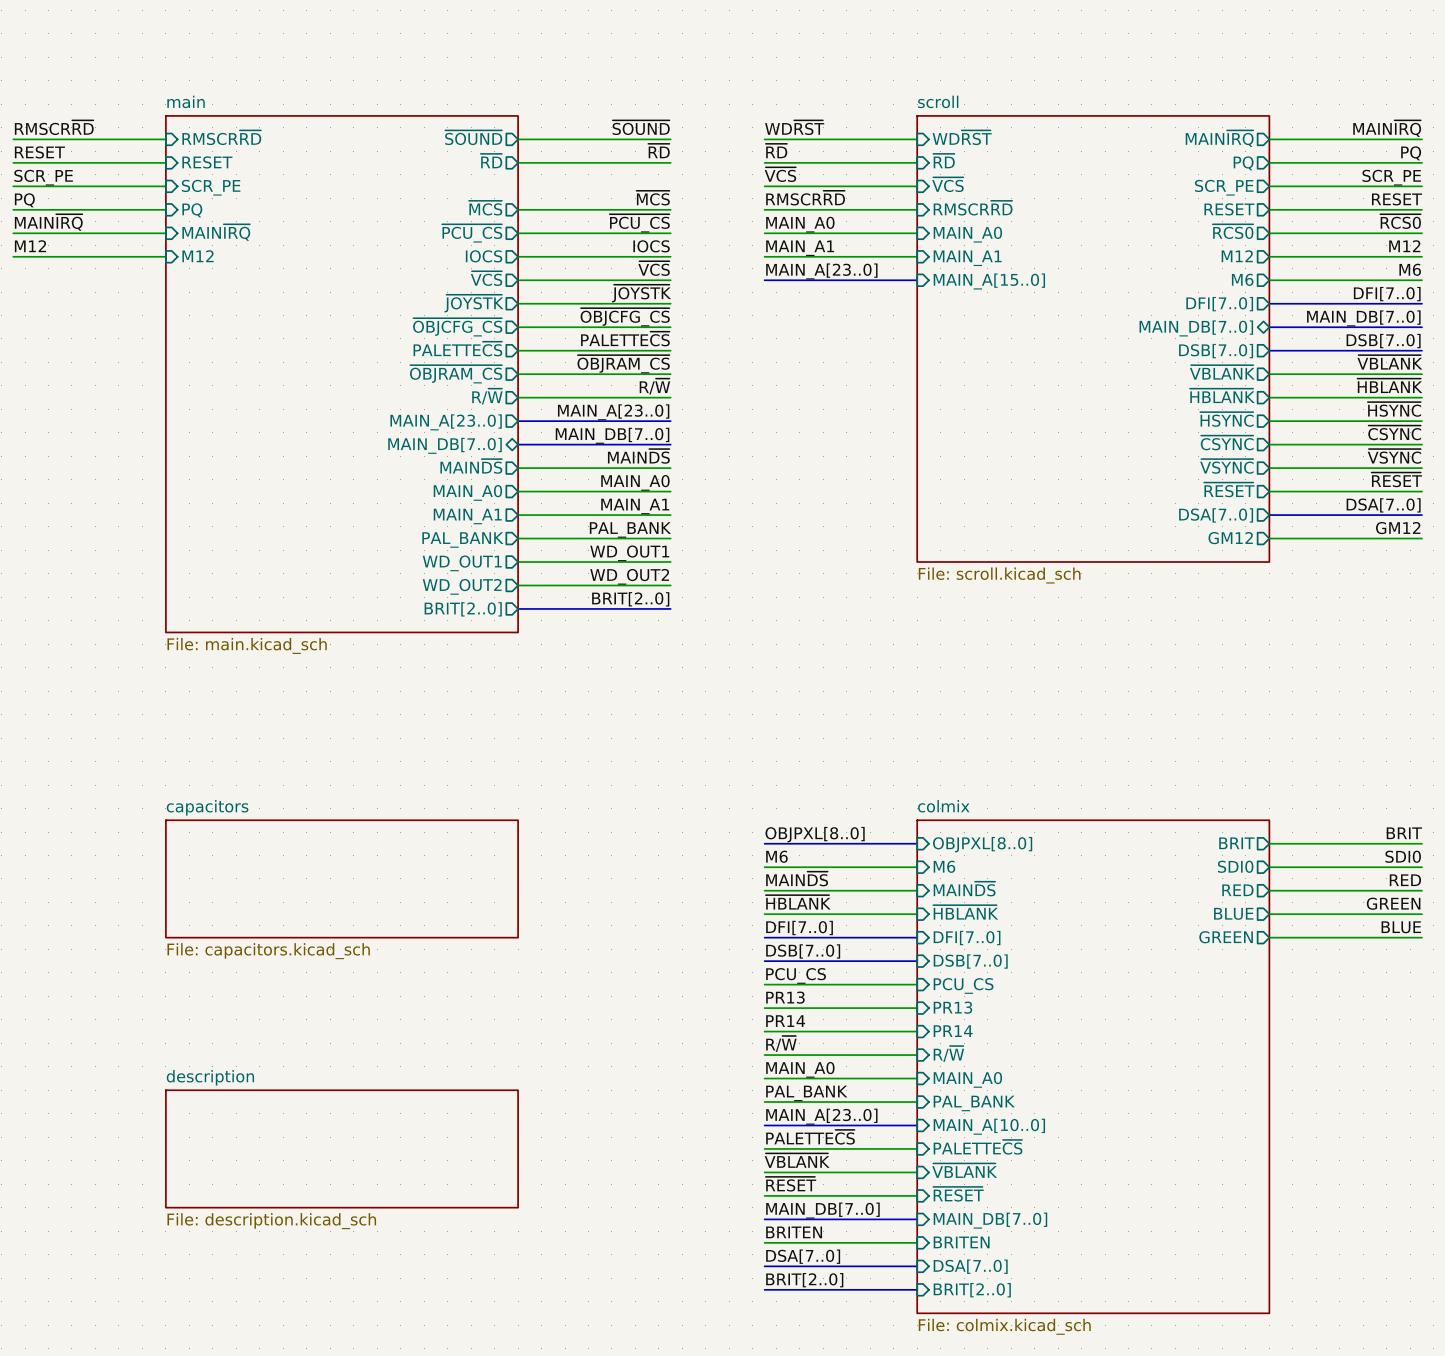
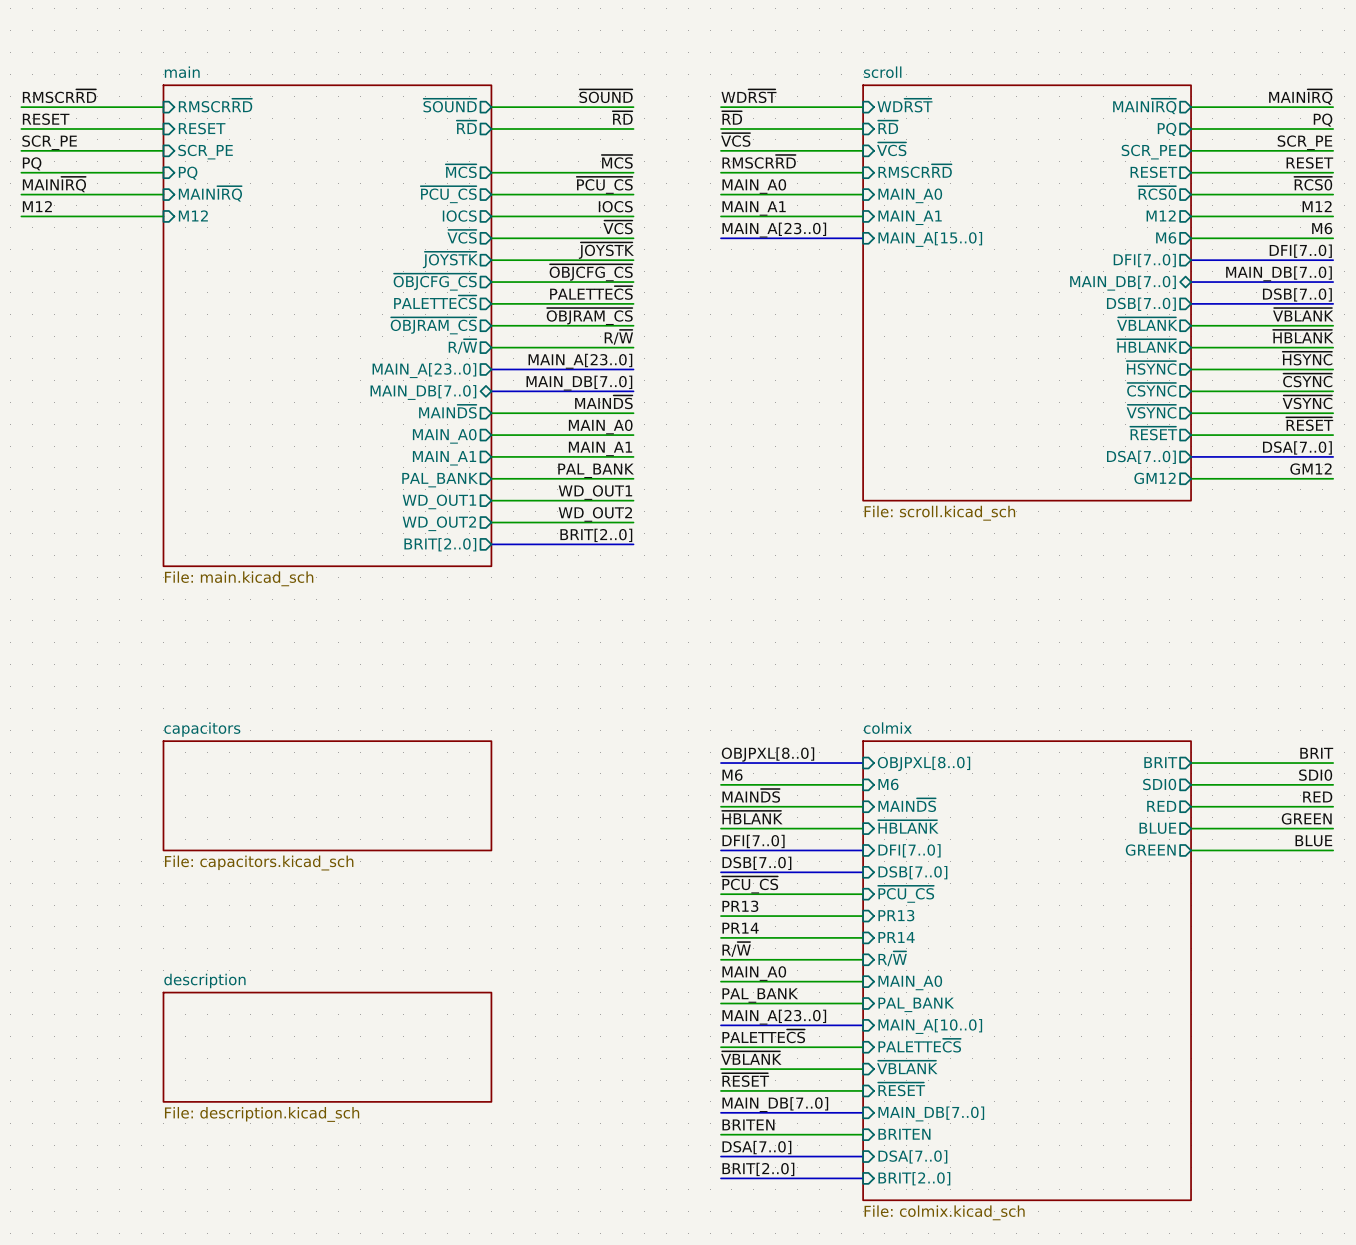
label: PCU_CS (796, 975) -> ~{PCU_CS} (750, 884)
sheet pin: PCU_CS (963, 985) -> ~{PCU_CS} (906, 894)

